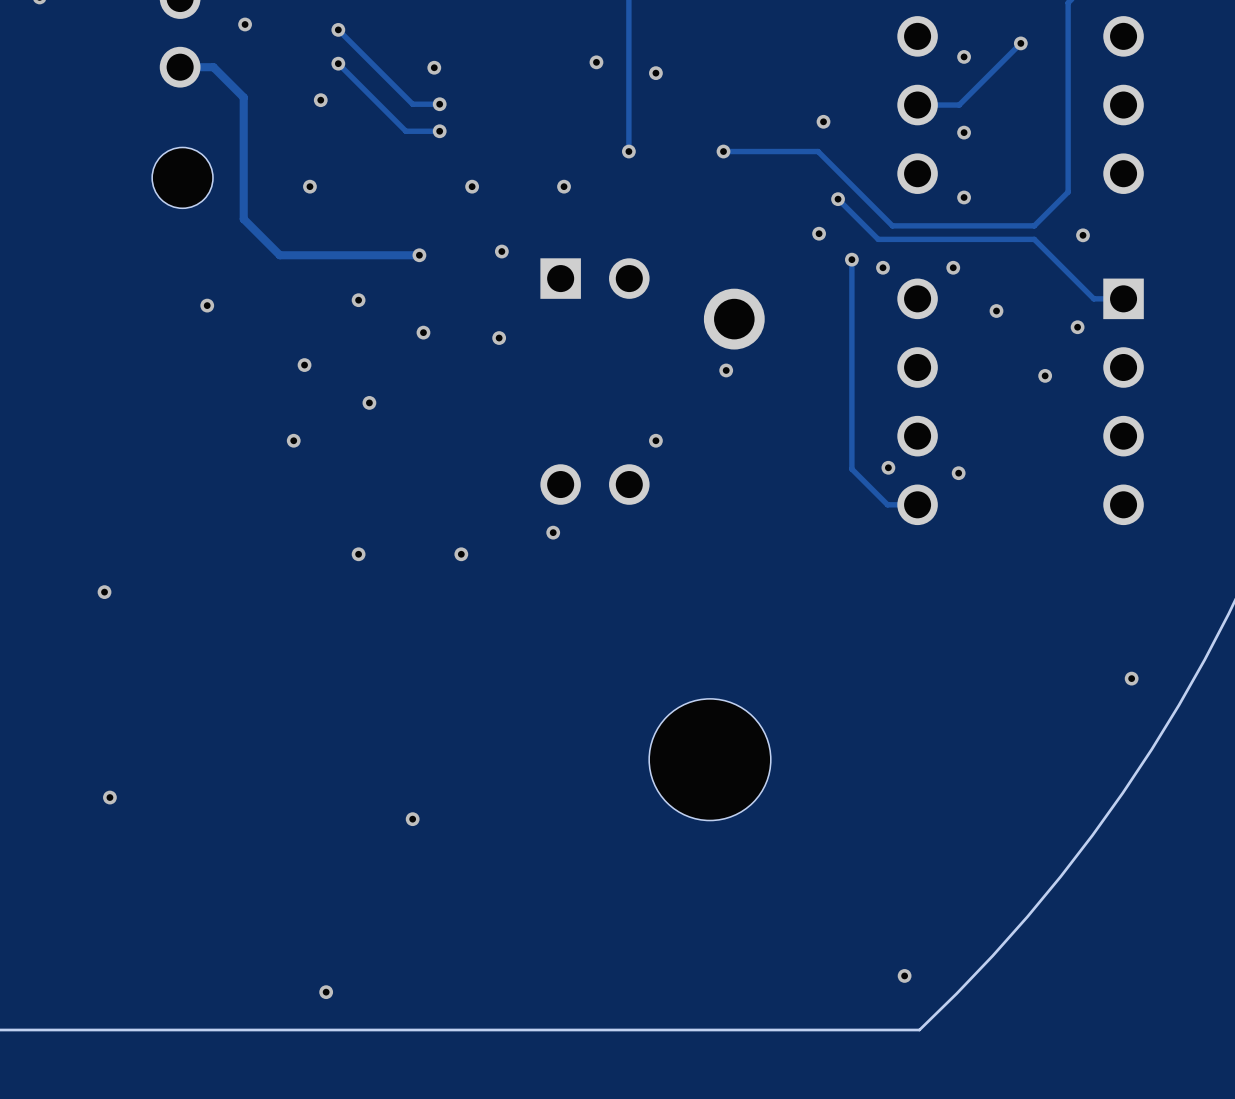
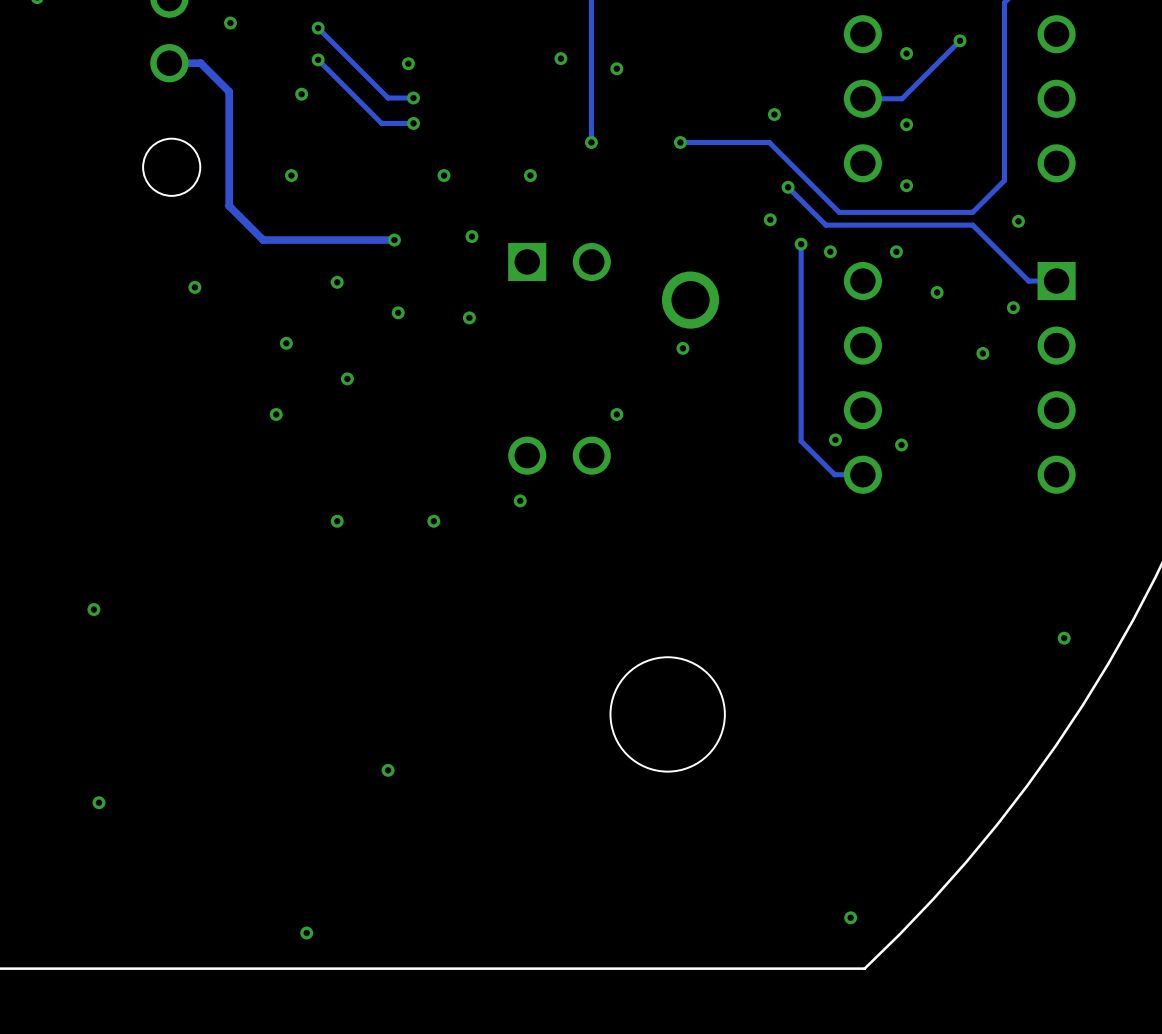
via position: (104, 592) -> (93, 609)
via position: (109, 797) -> (99, 802)

